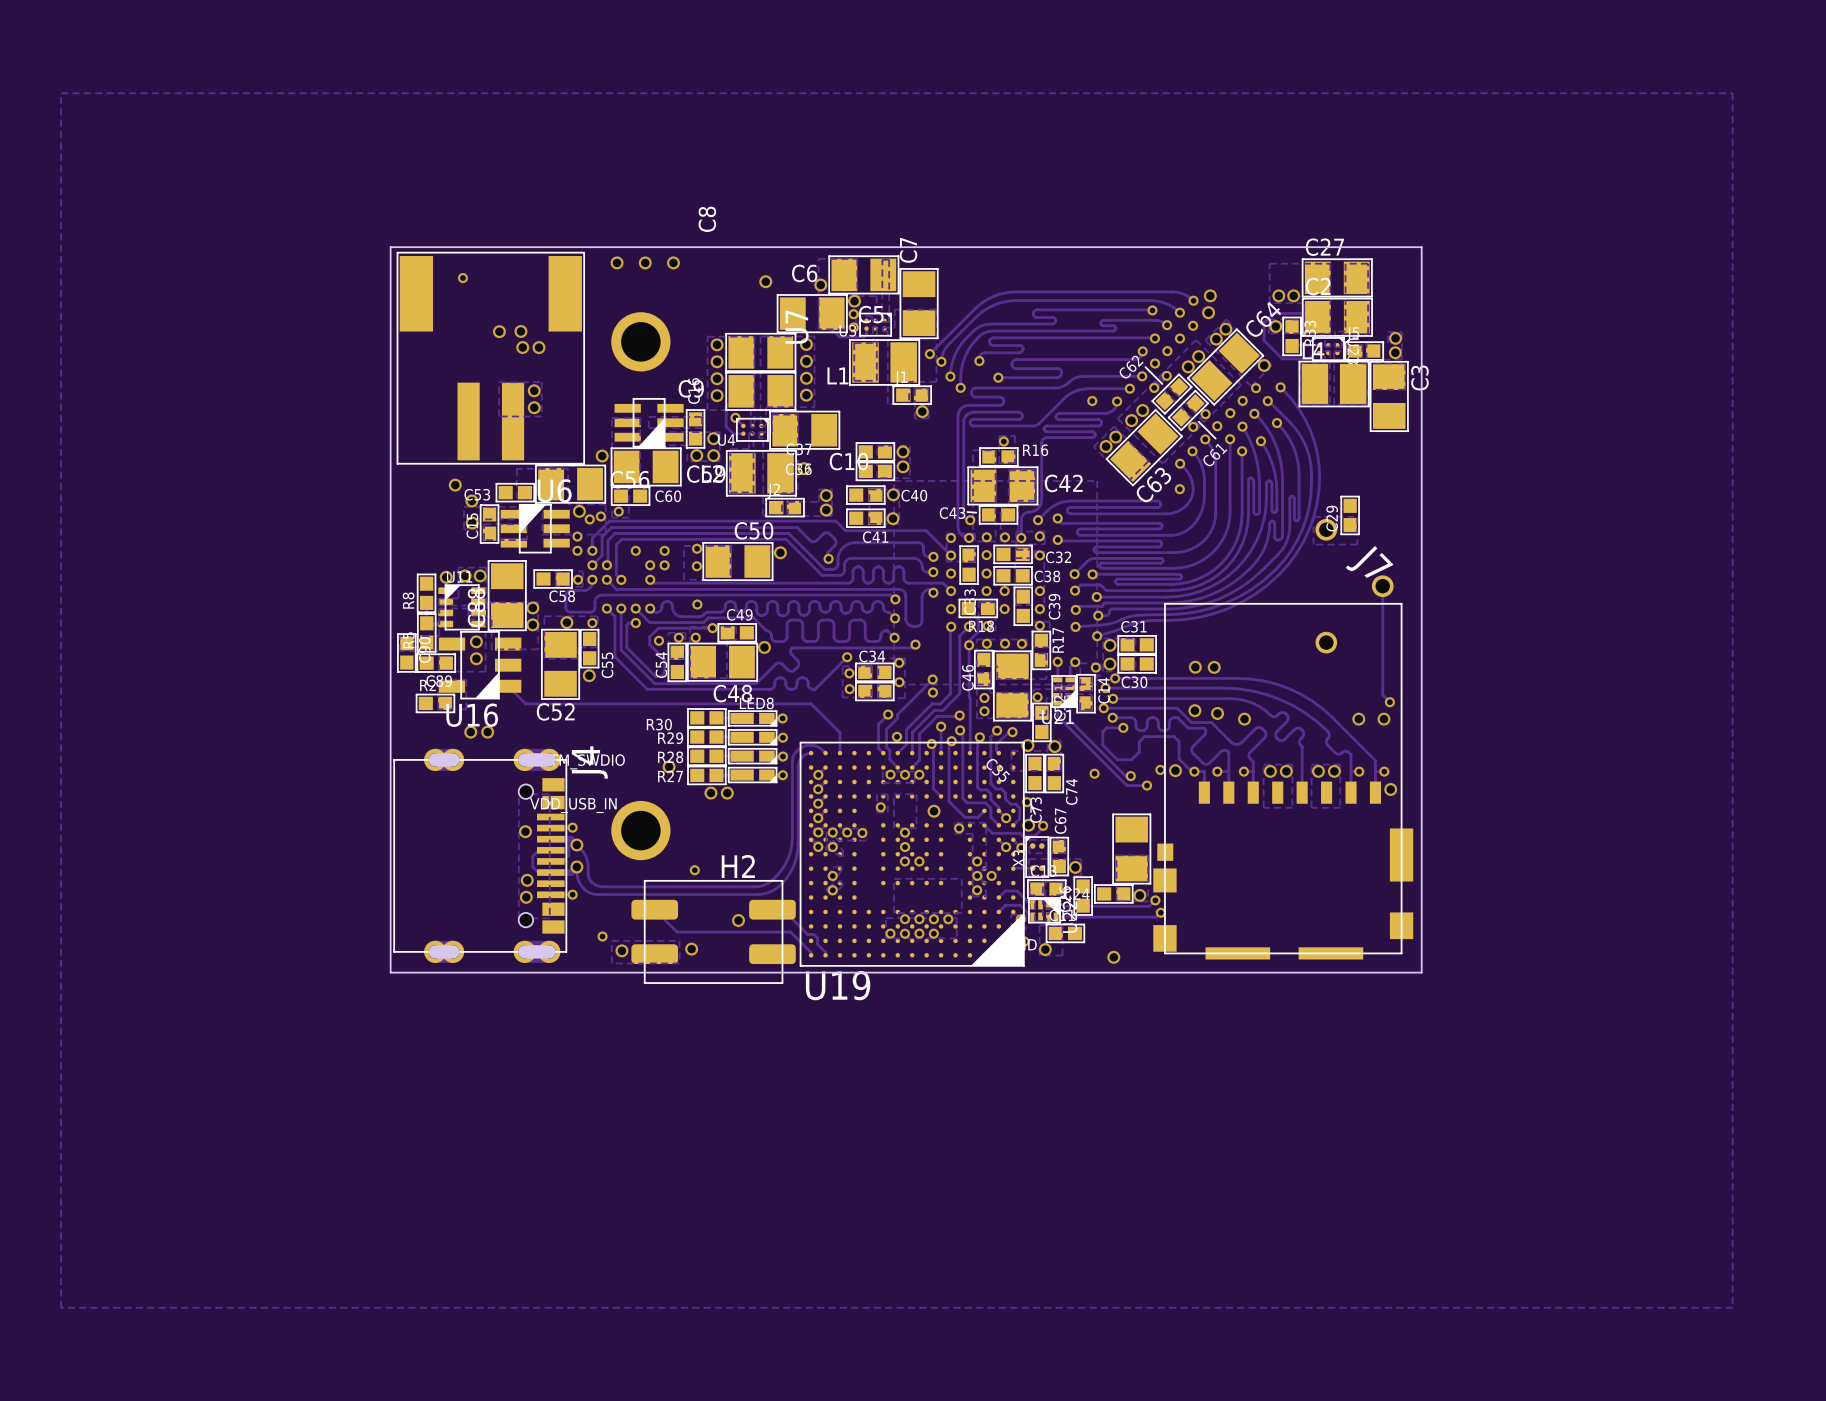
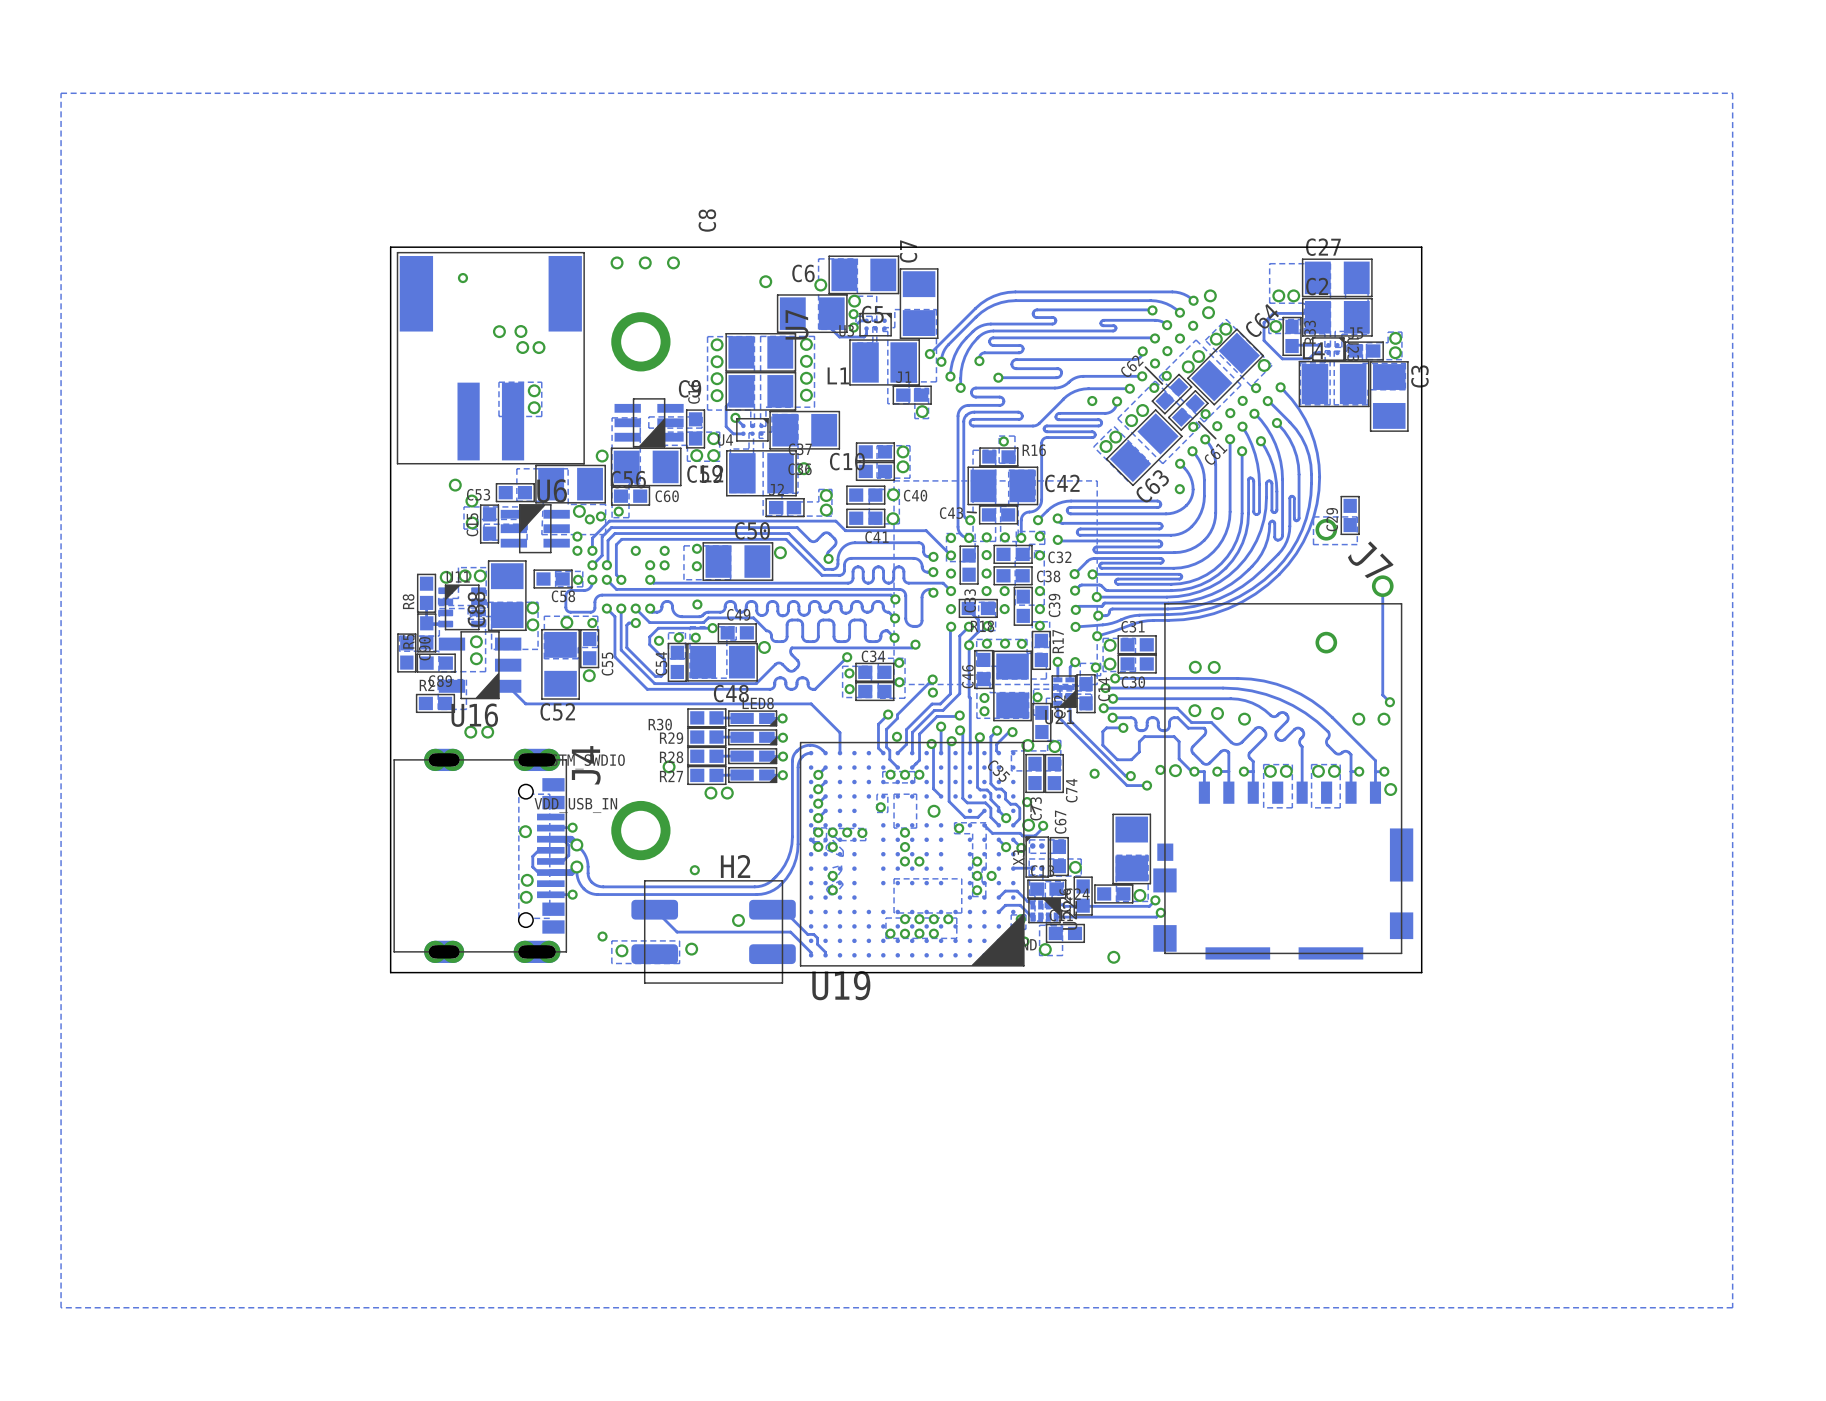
zone outline: (889, 259) (889, 322) (882, 322) (882, 259) (889, 259) -> none

